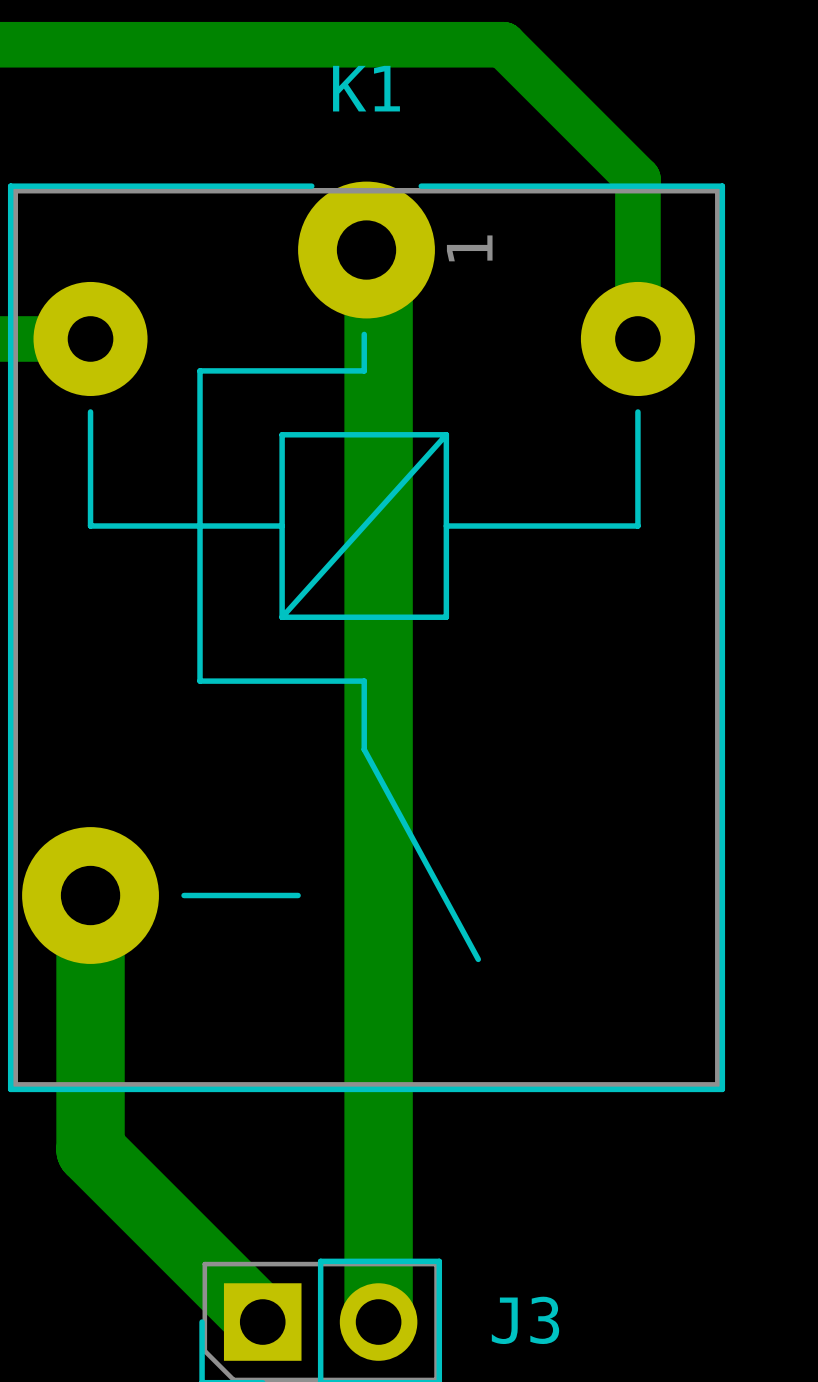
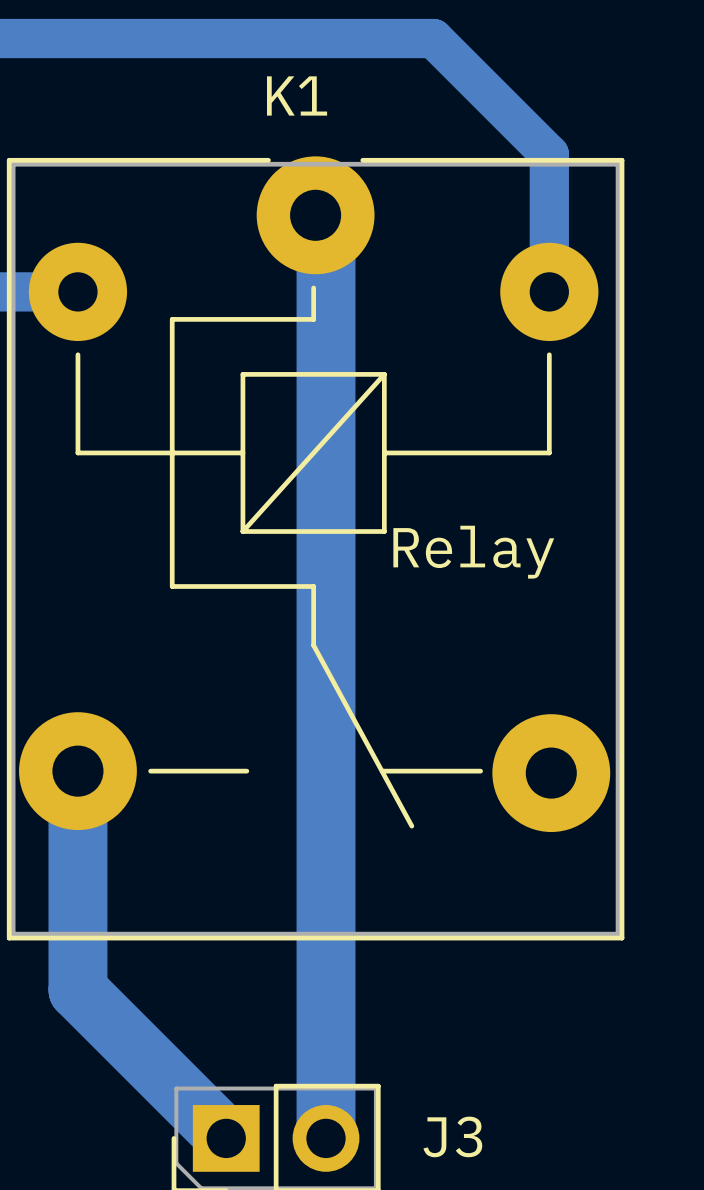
K1 footprint: [7, 181, 726, 1093] -> [6, 156, 625, 941]
K1 value: none -> Relay (473, 552)

